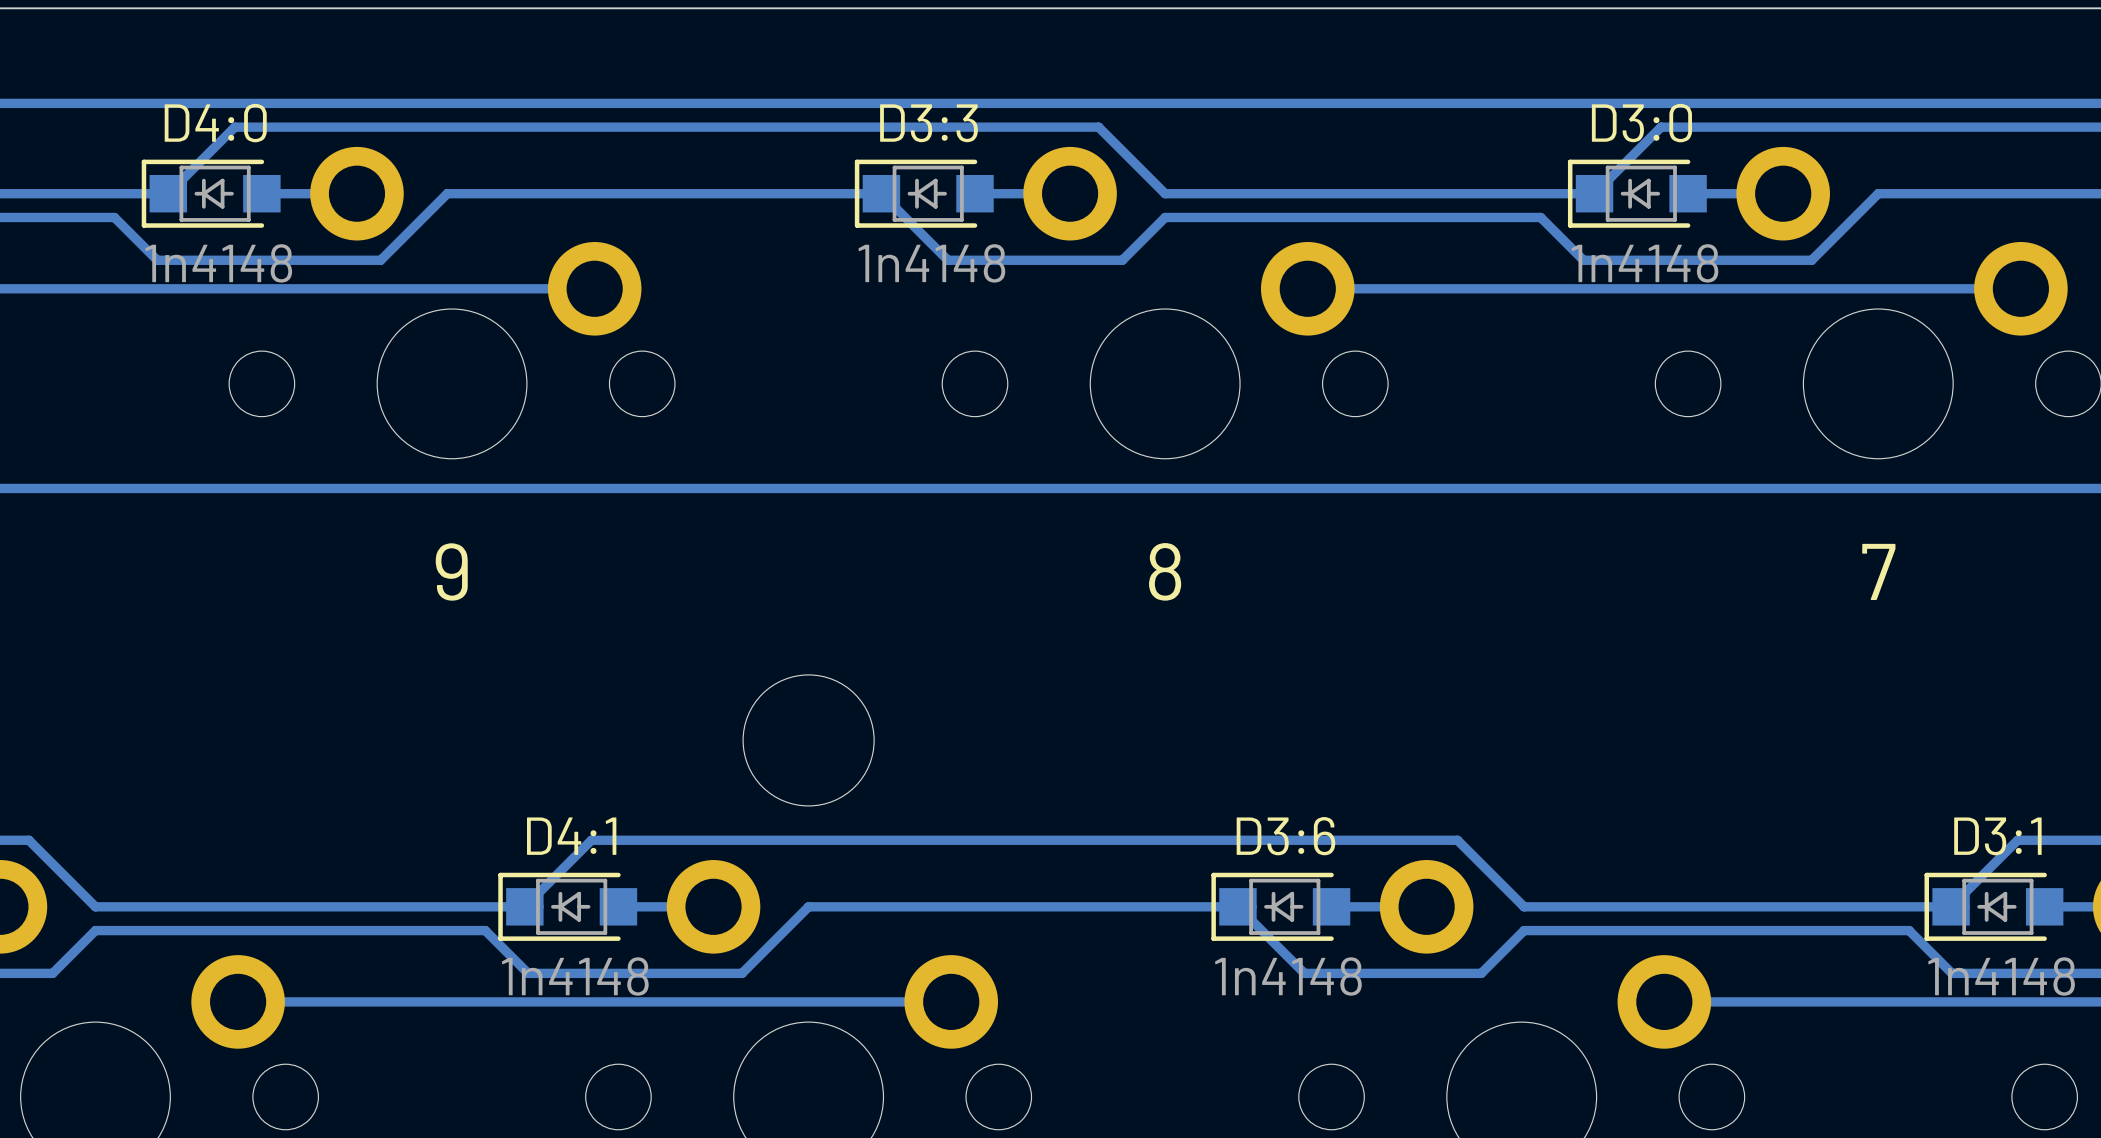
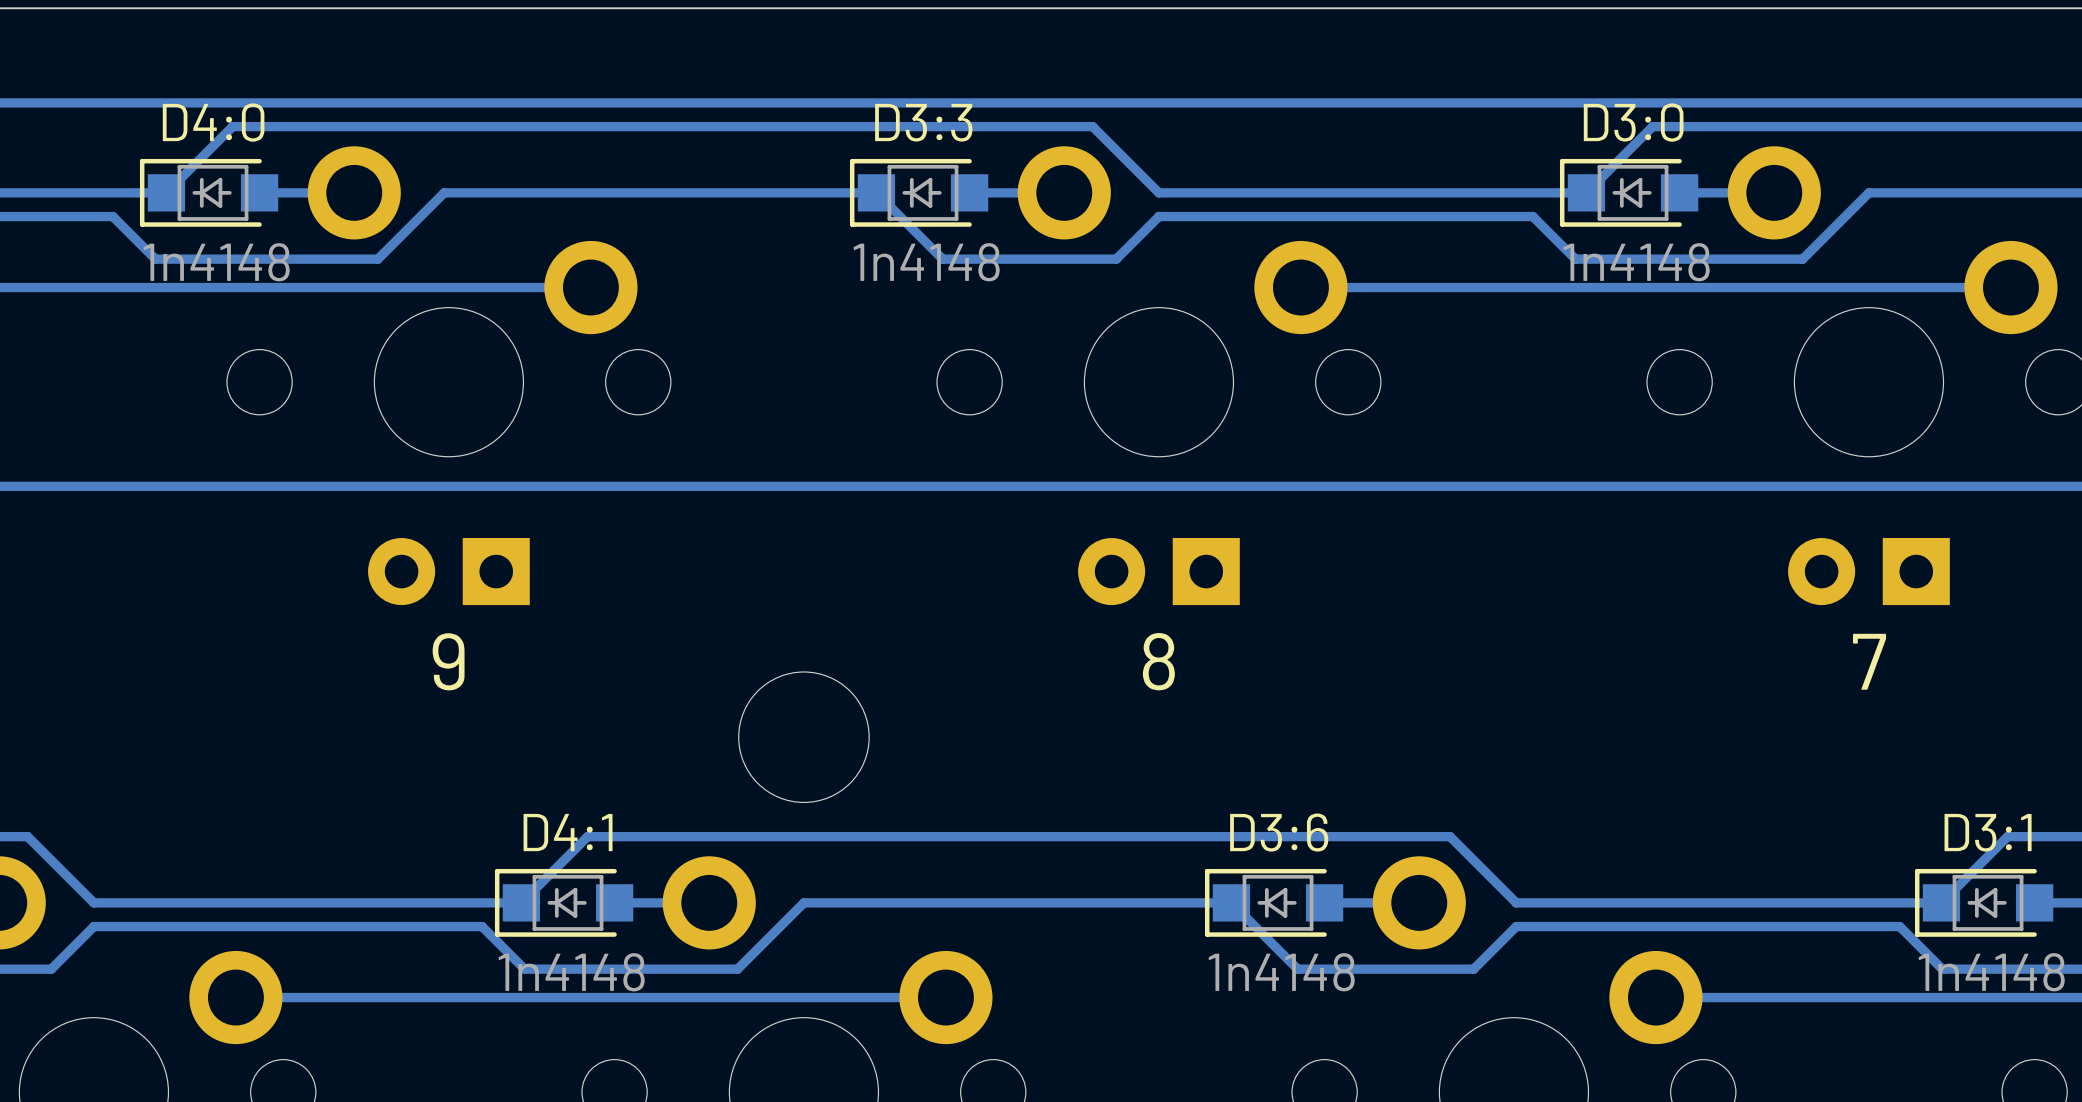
text position: 9 (451, 571) -> 9 (448, 661)
text position: 8 (1165, 571) -> 8 (1158, 661)
text position: 7 (1878, 571) -> 7 (1869, 661)
part: none -> (448, 571)
part: none -> (1158, 571)
part: none -> (1868, 571)

